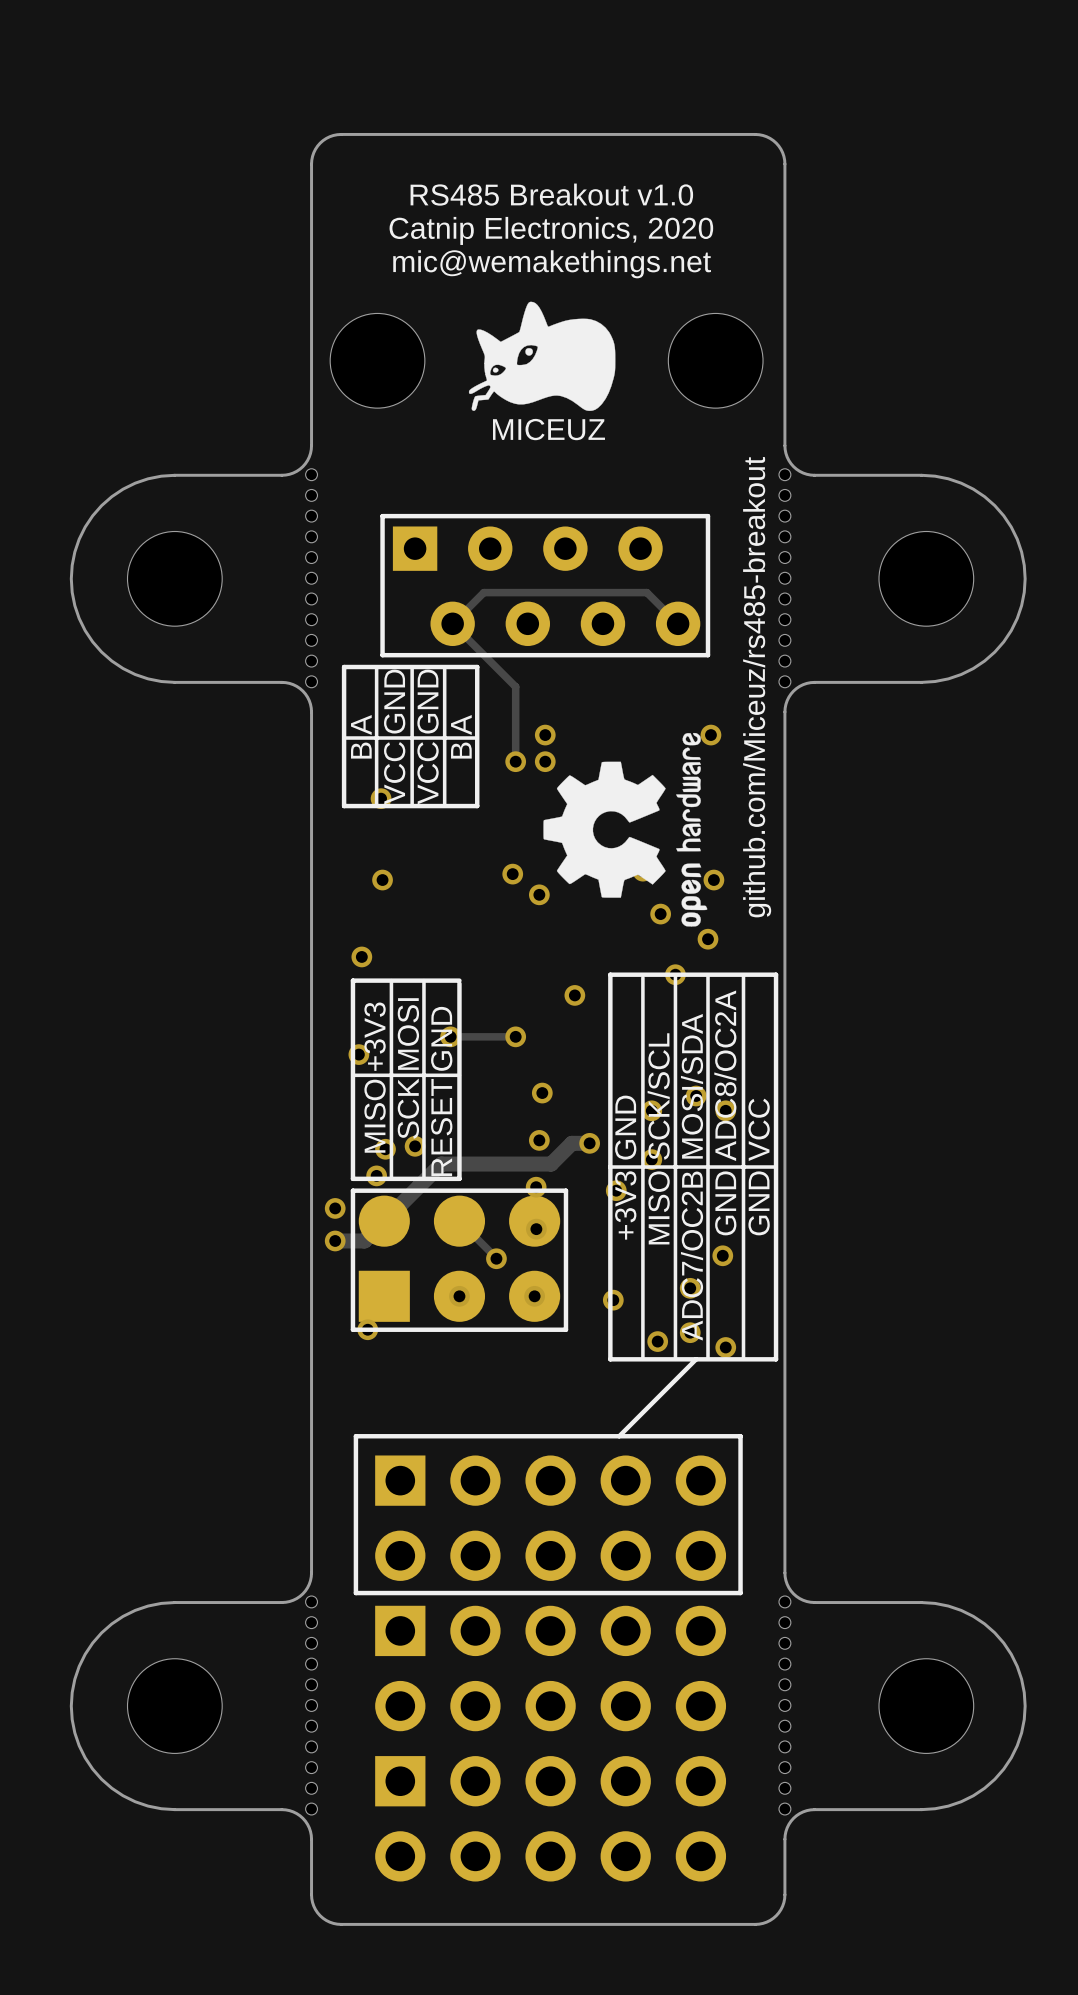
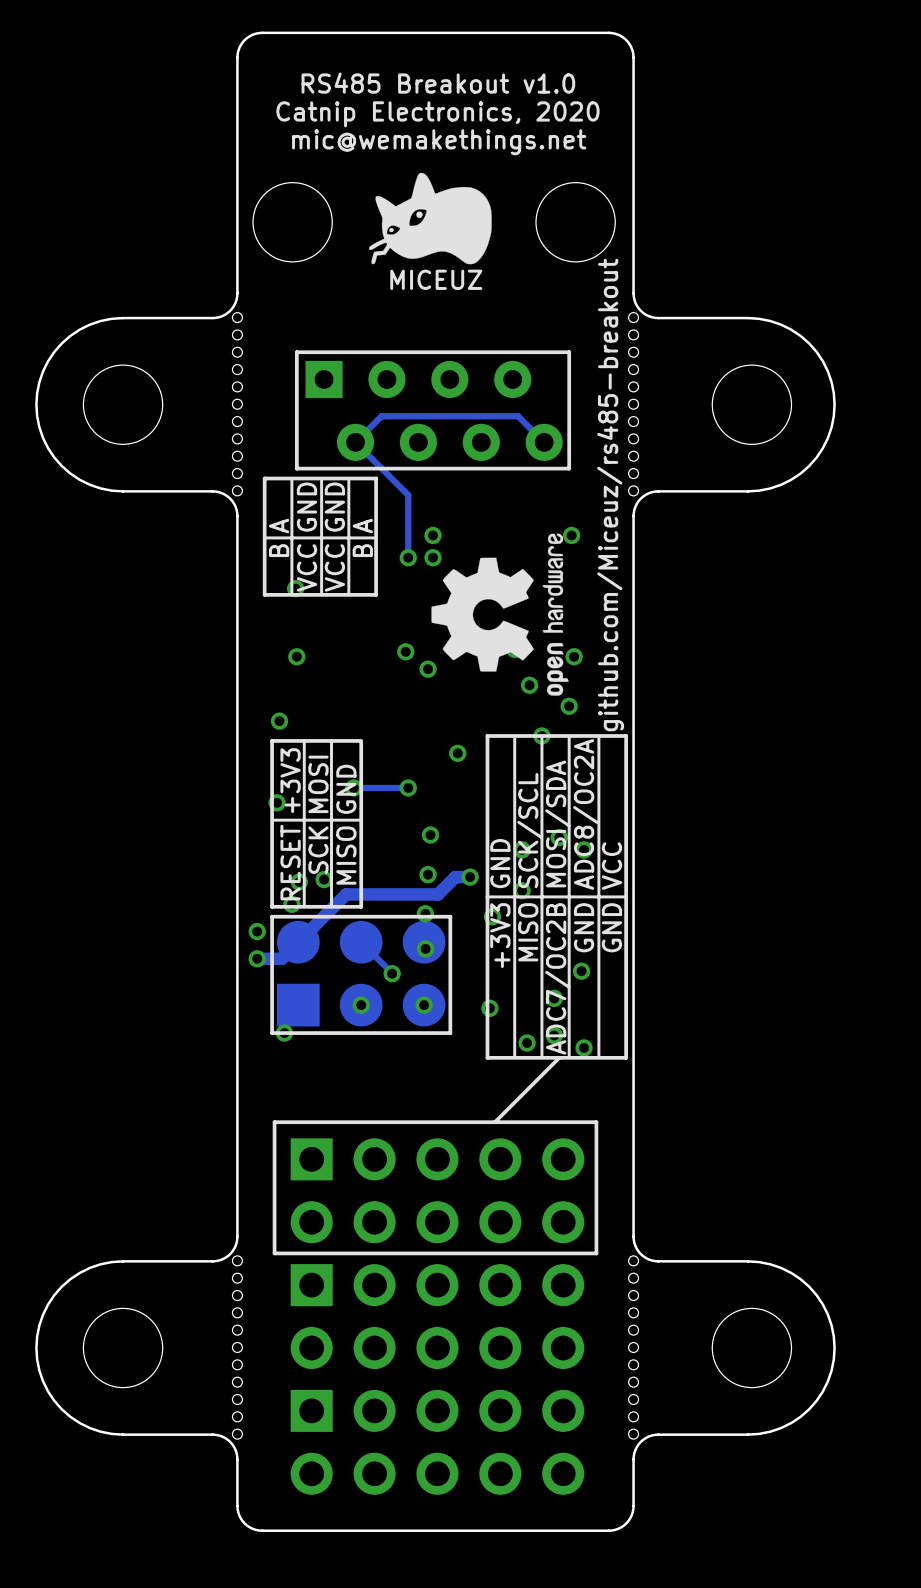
text: MISO (375, 1116) -> RESET (290, 862)
text: RESET (441, 1127) -> MISO (346, 855)

